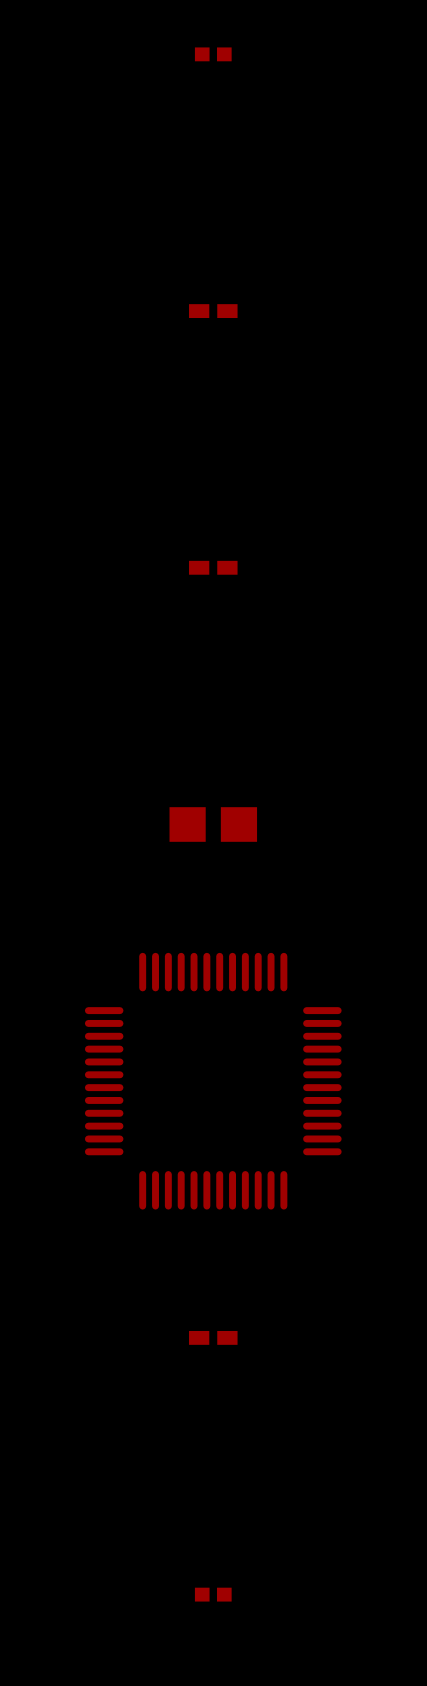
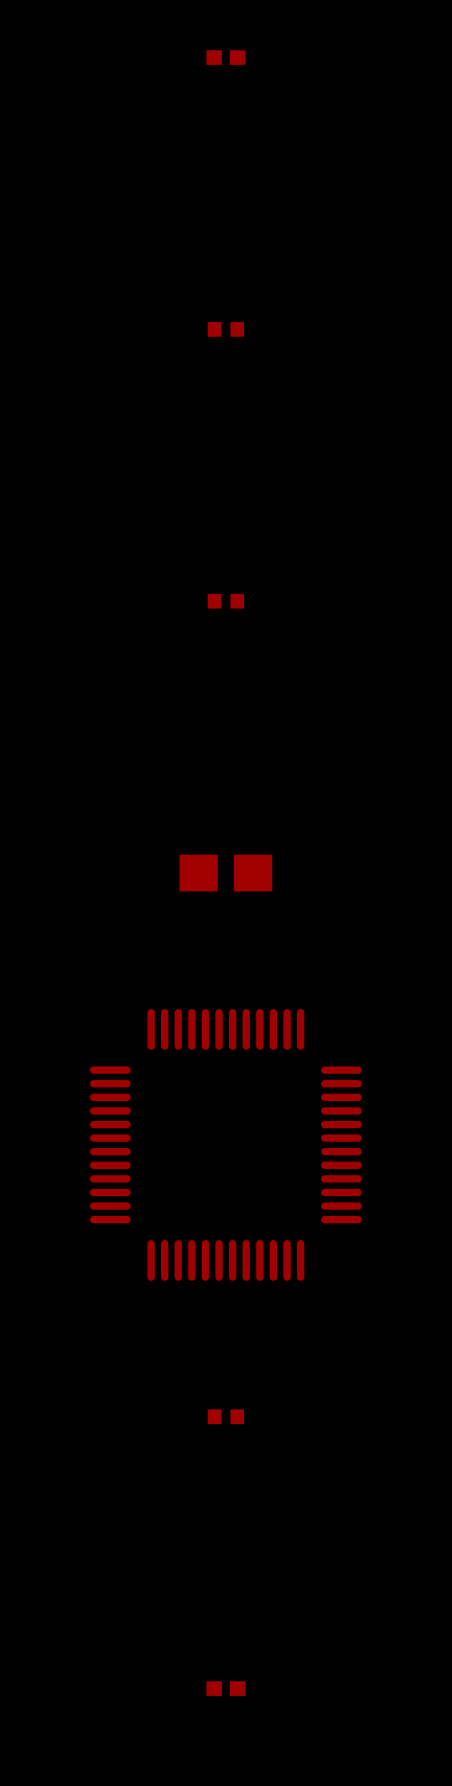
part footprint: [189, 304, 238, 319] -> [207, 322, 245, 337]
part footprint: [189, 560, 238, 575] -> [207, 593, 245, 609]
part footprint: [189, 1330, 238, 1345] -> [207, 1409, 245, 1425]

